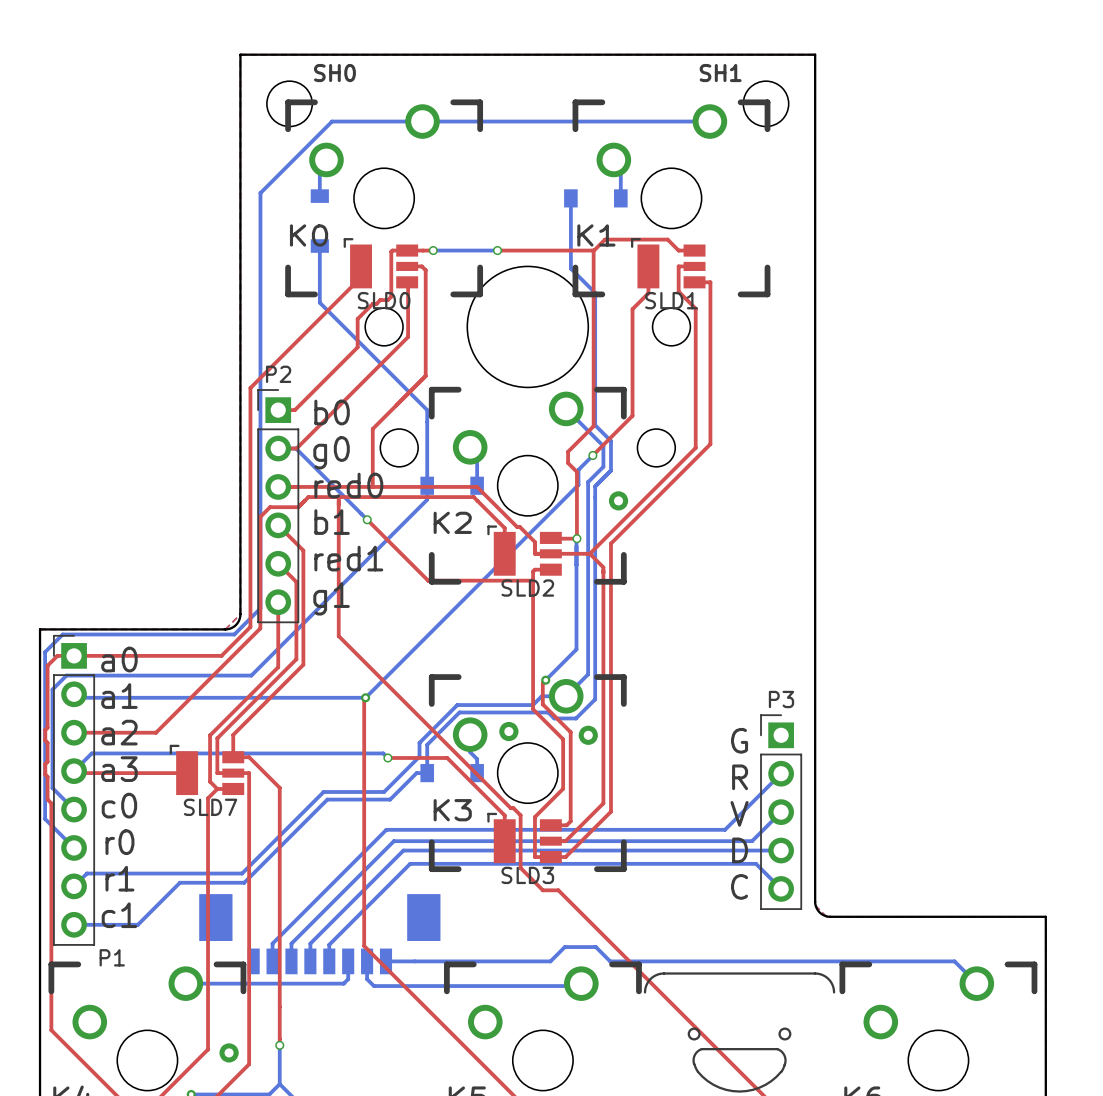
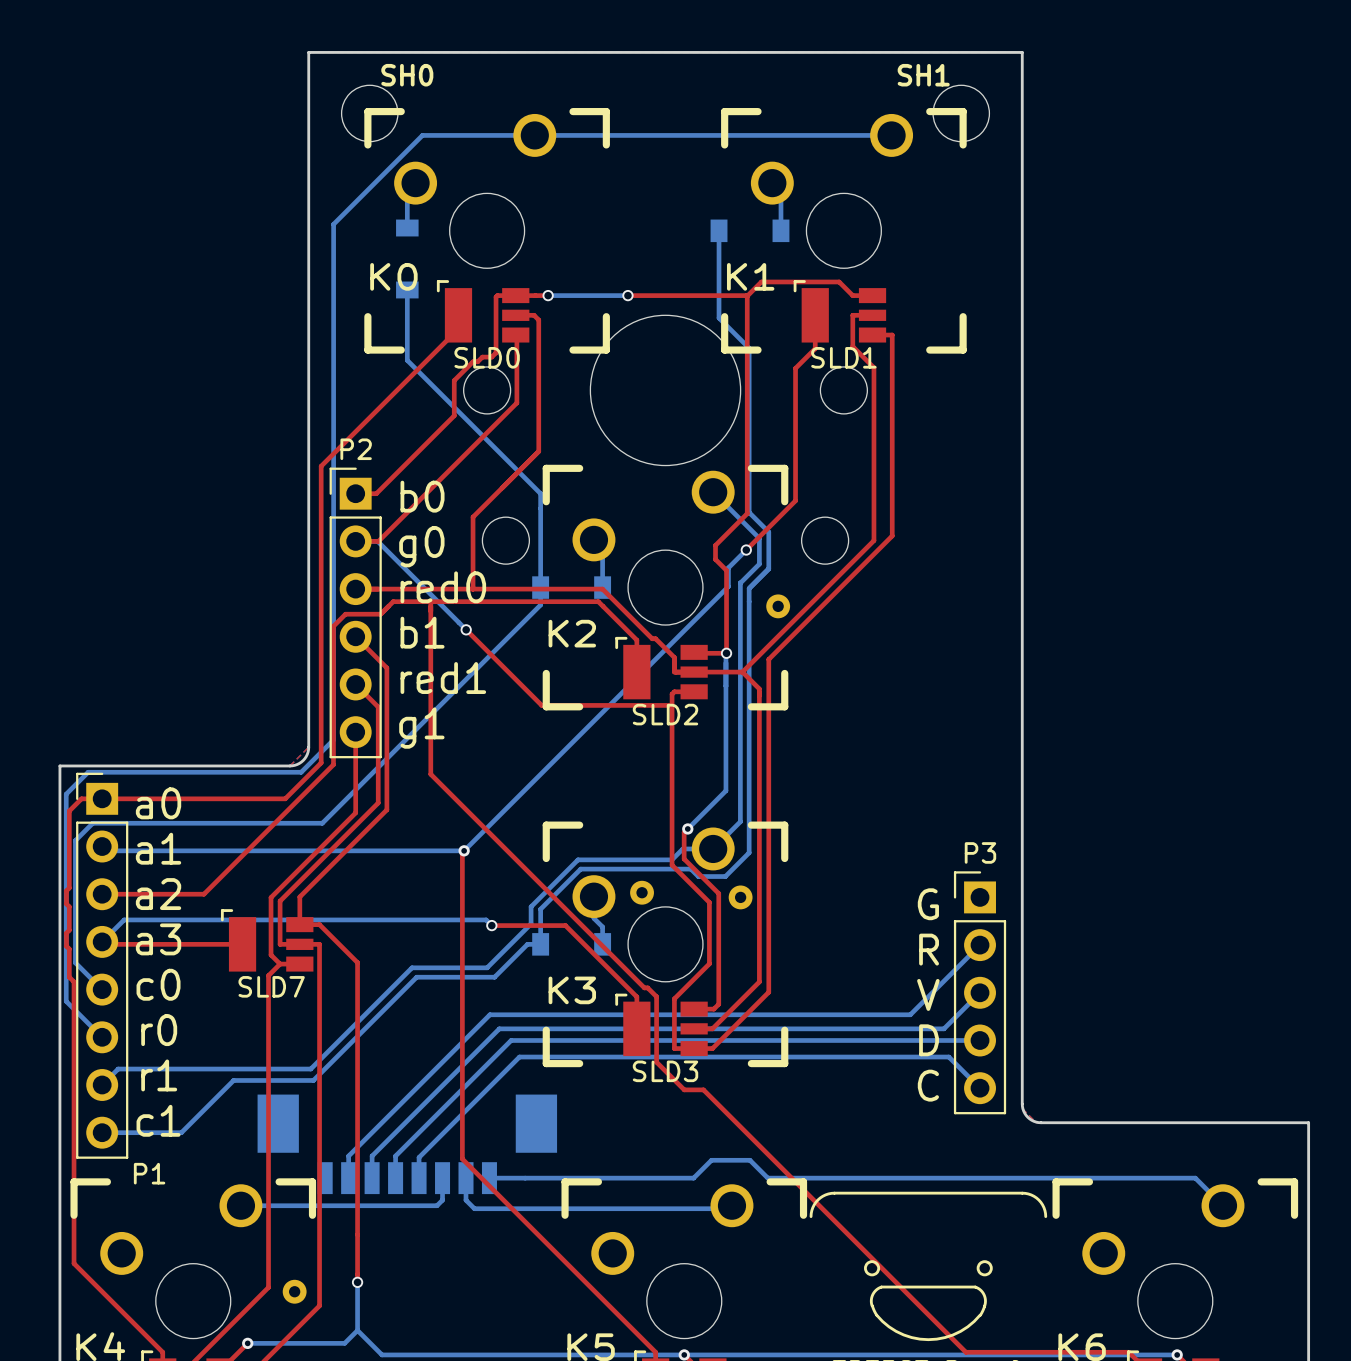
SH0 name position: SH0 (334, 73) -> SH0 (407, 75)
SH1 name position: SH1 (720, 73) -> SH1 (923, 75)

